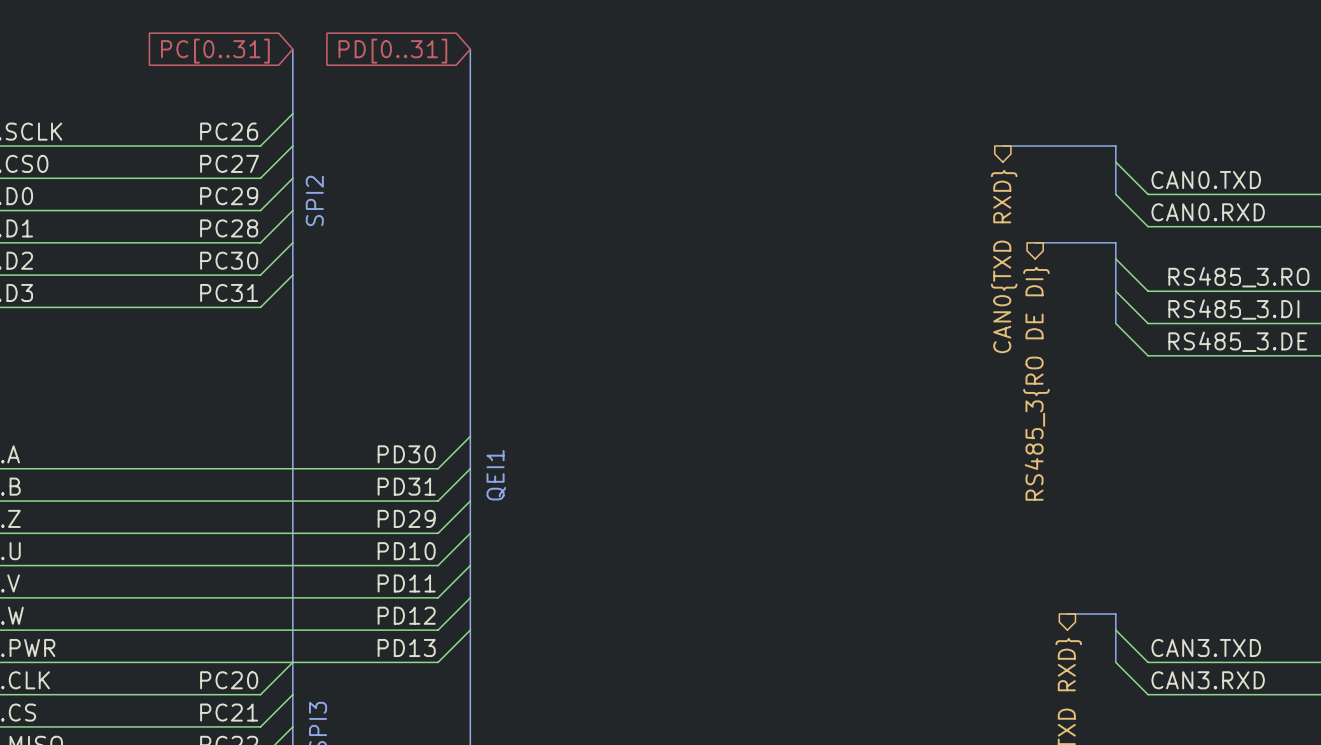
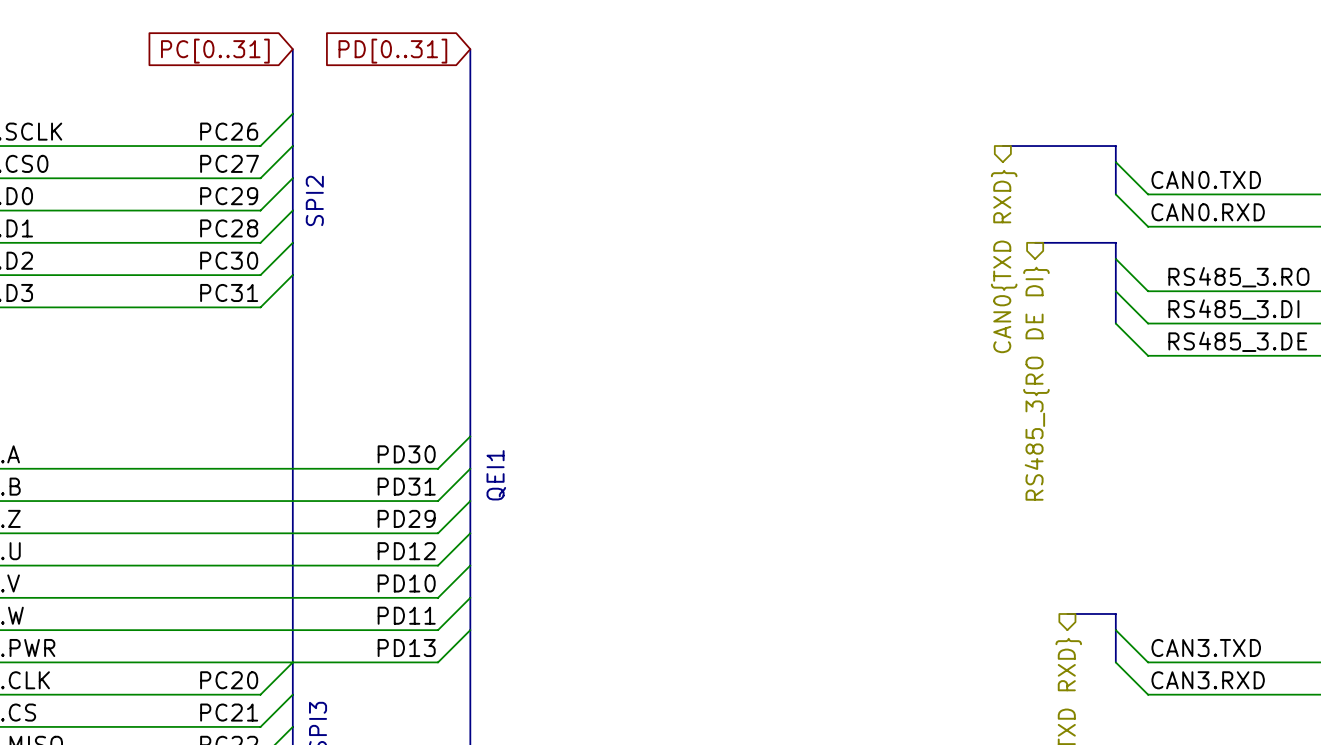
label: PD10 (406, 551) -> PD12 (406, 551)
label: PD11 (406, 583) -> PD10 (406, 583)
label: PD12 (406, 615) -> PD11 (406, 615)

